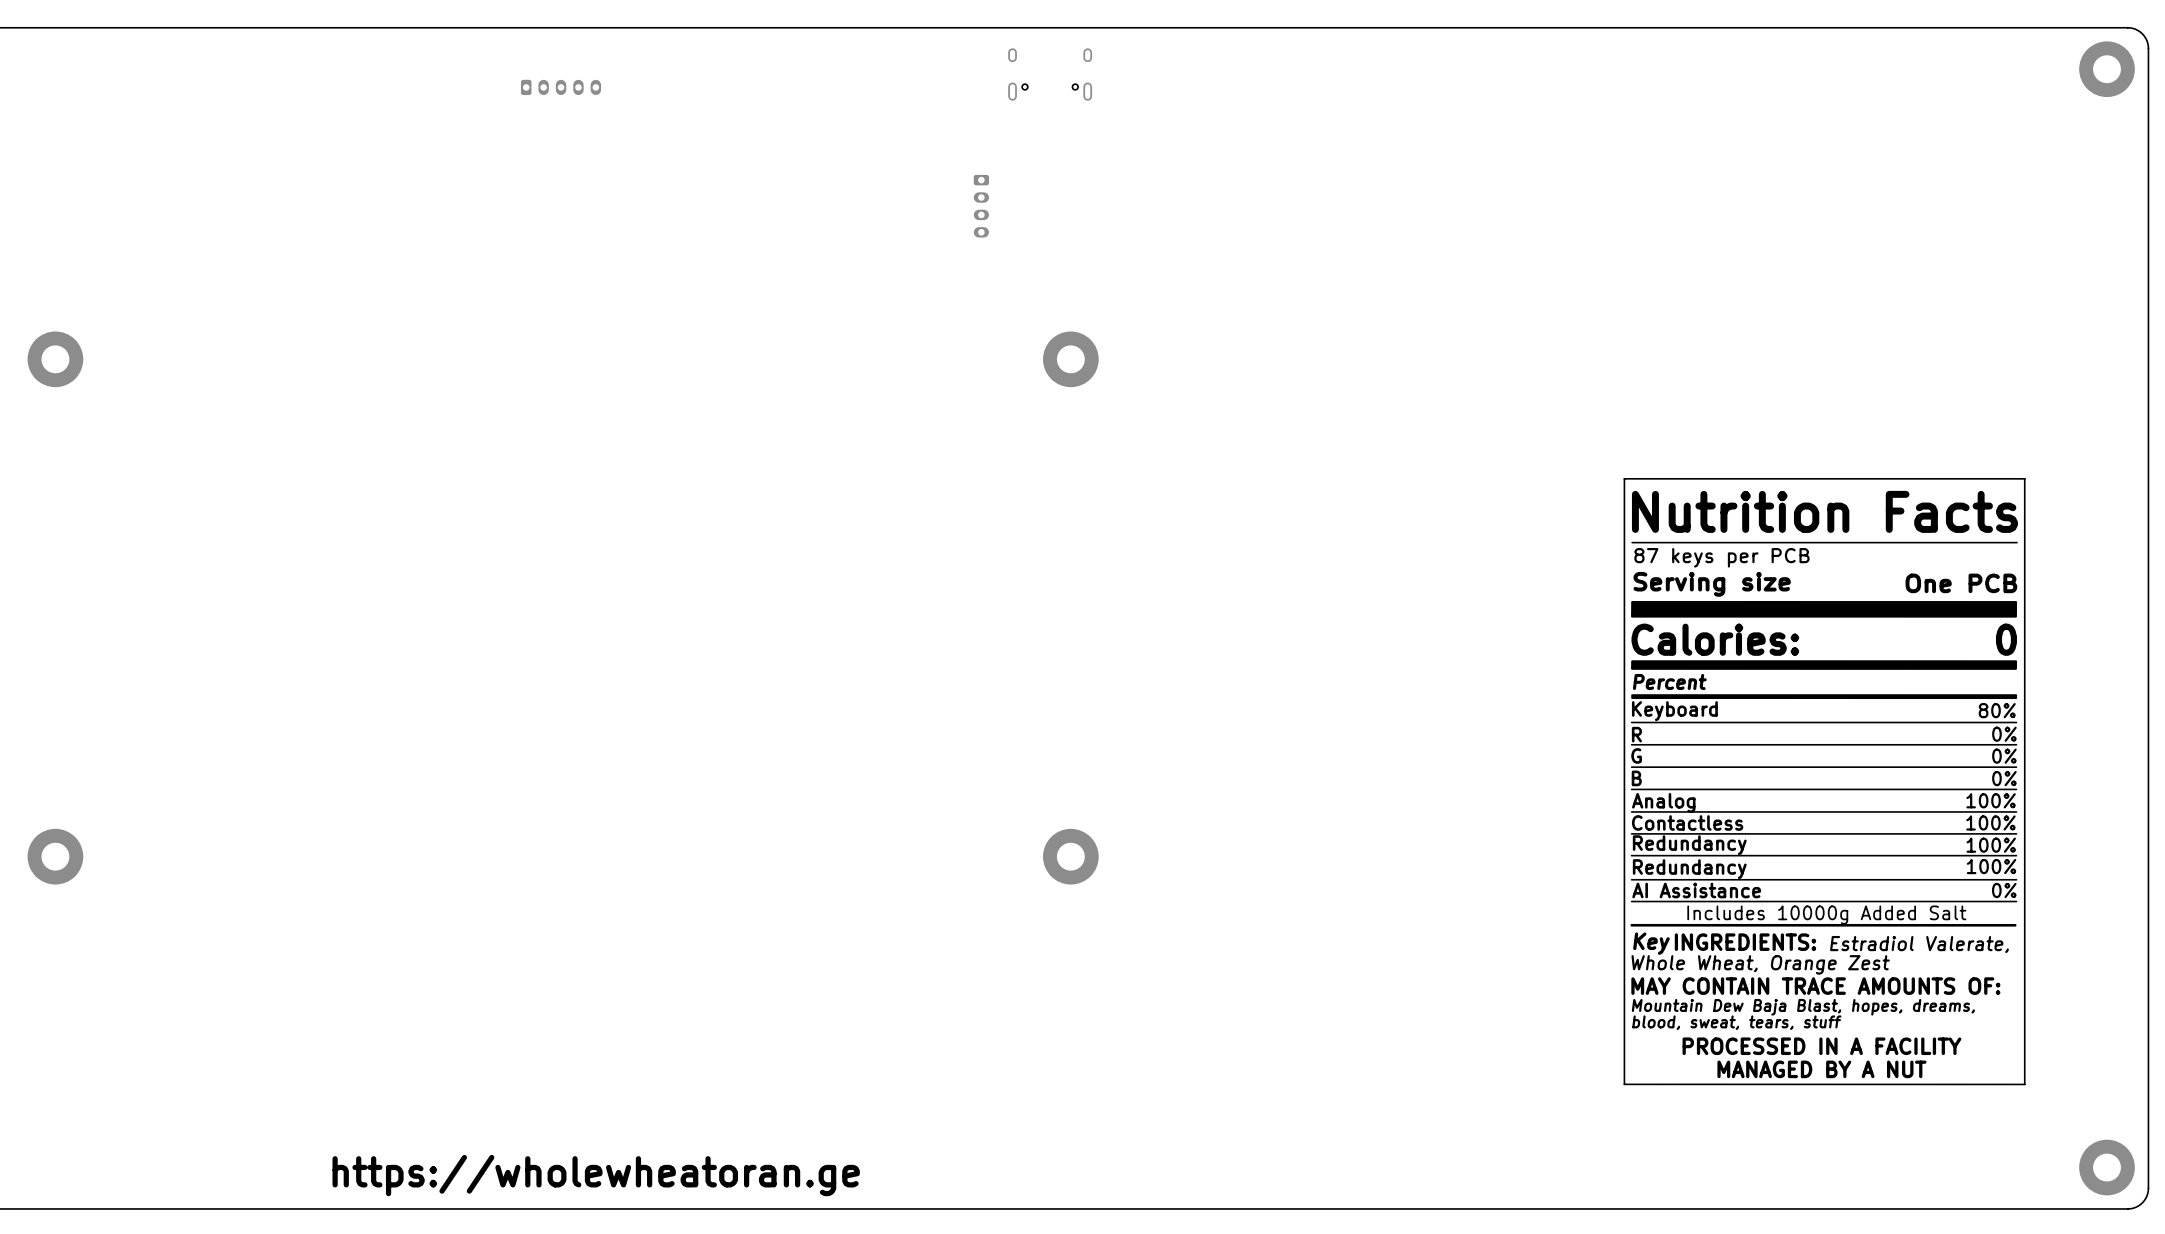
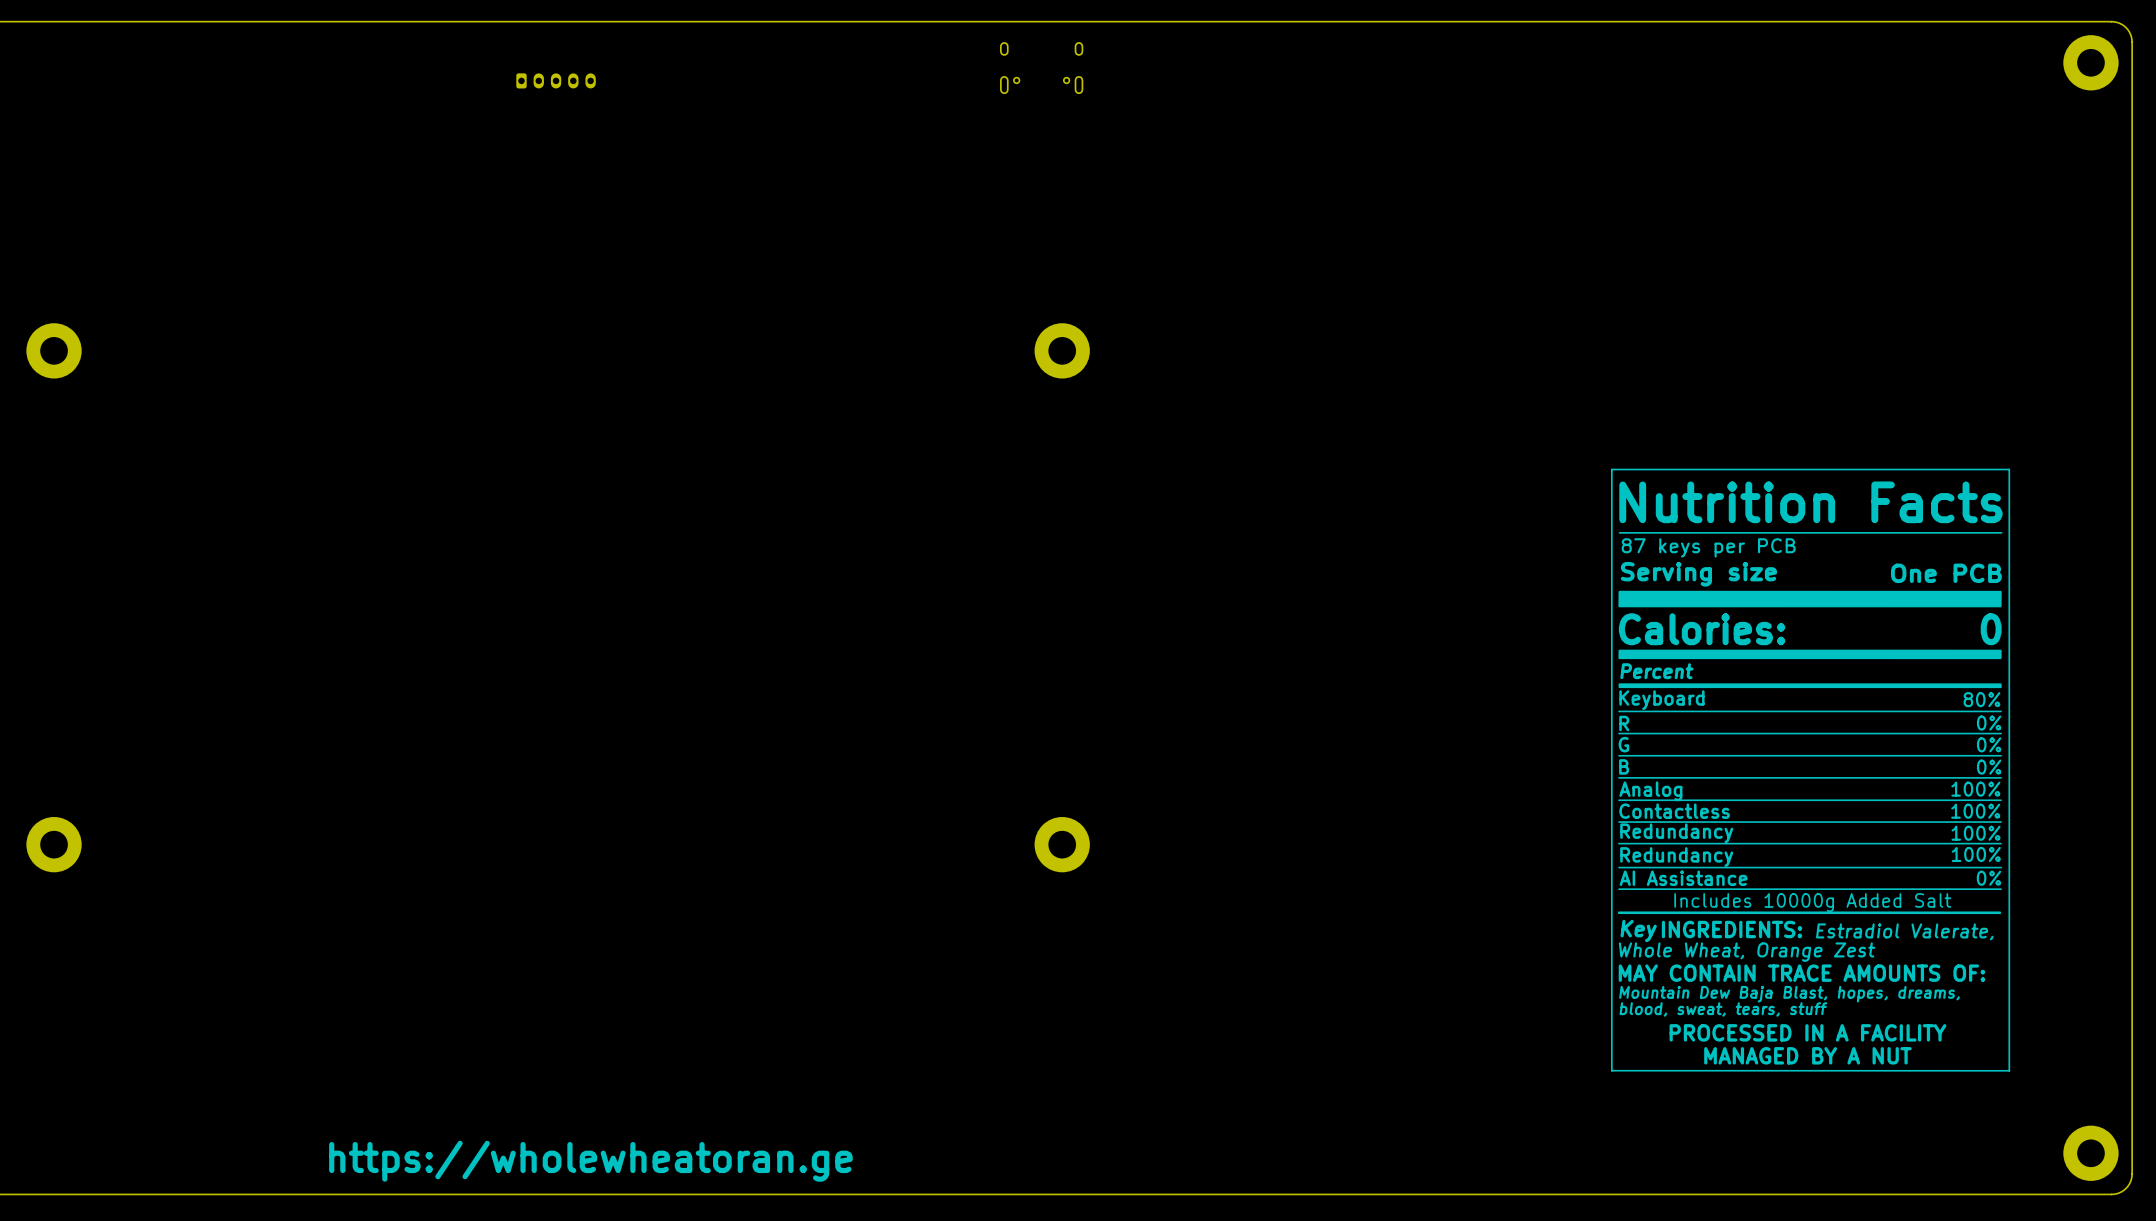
part: (981, 206) -> none

